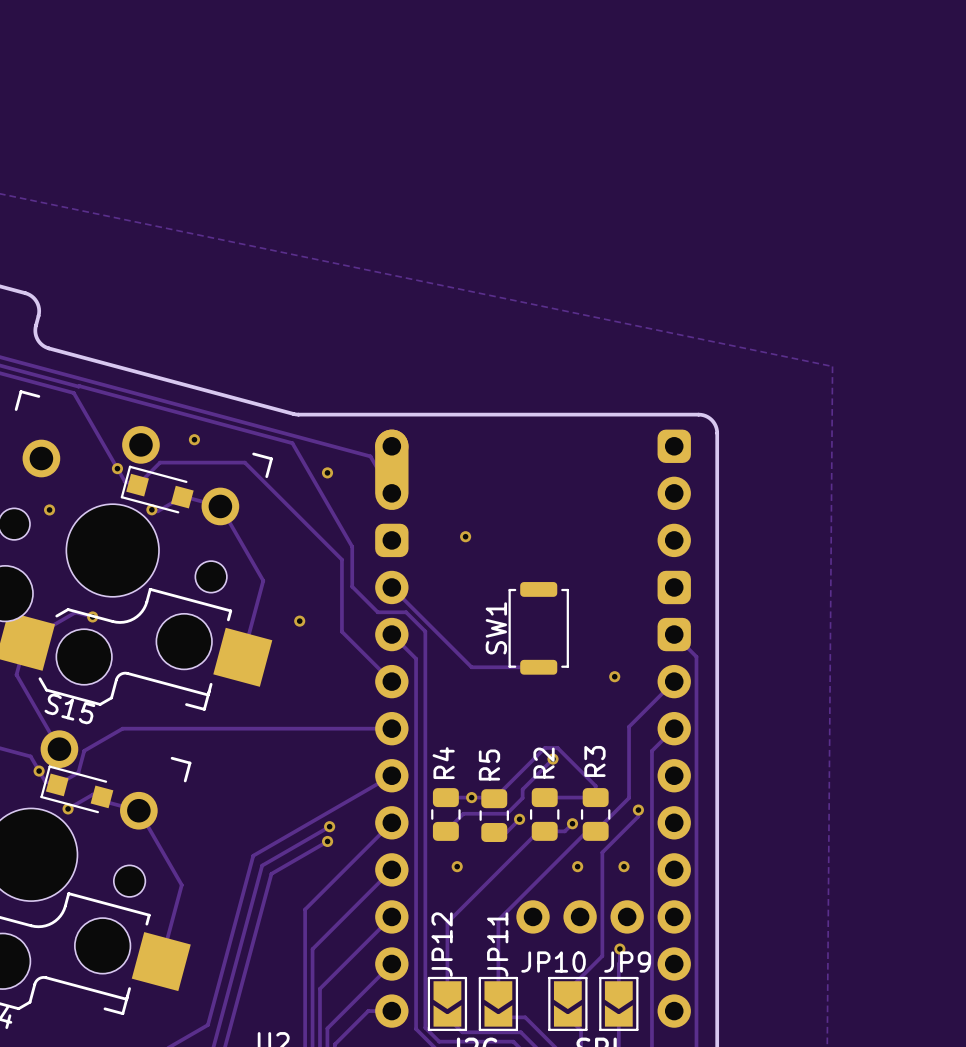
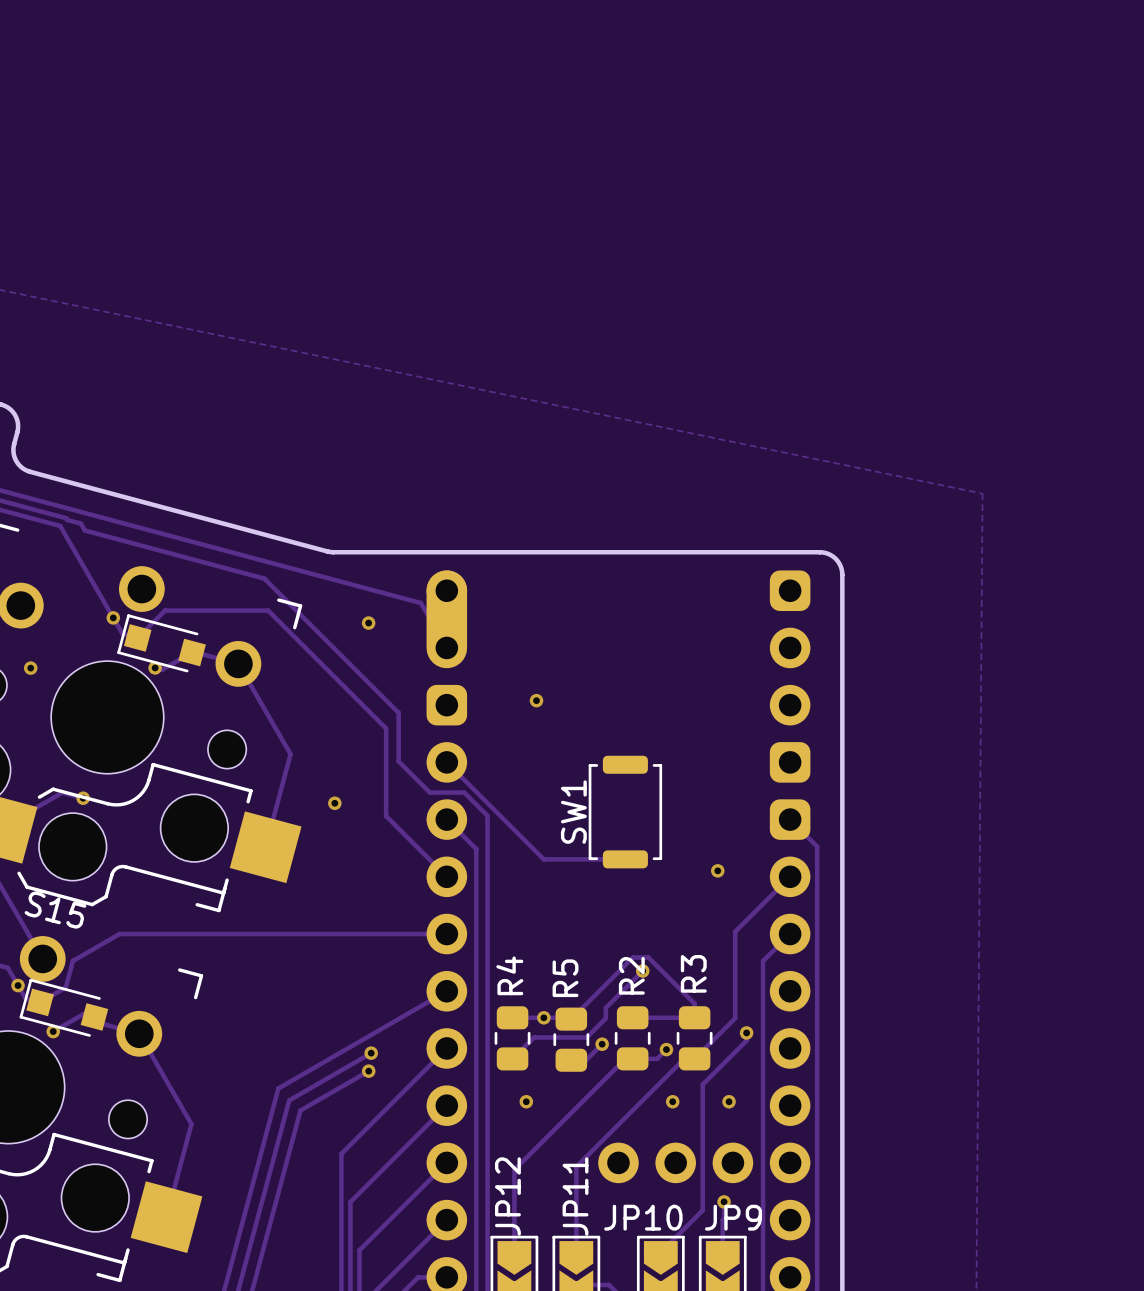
track: (78, 386) (292, 443) (352, 546) -> (66, 518) (80, 523) (84, 530) (264, 578) (398, 712)
via: (194, 439) -> none

